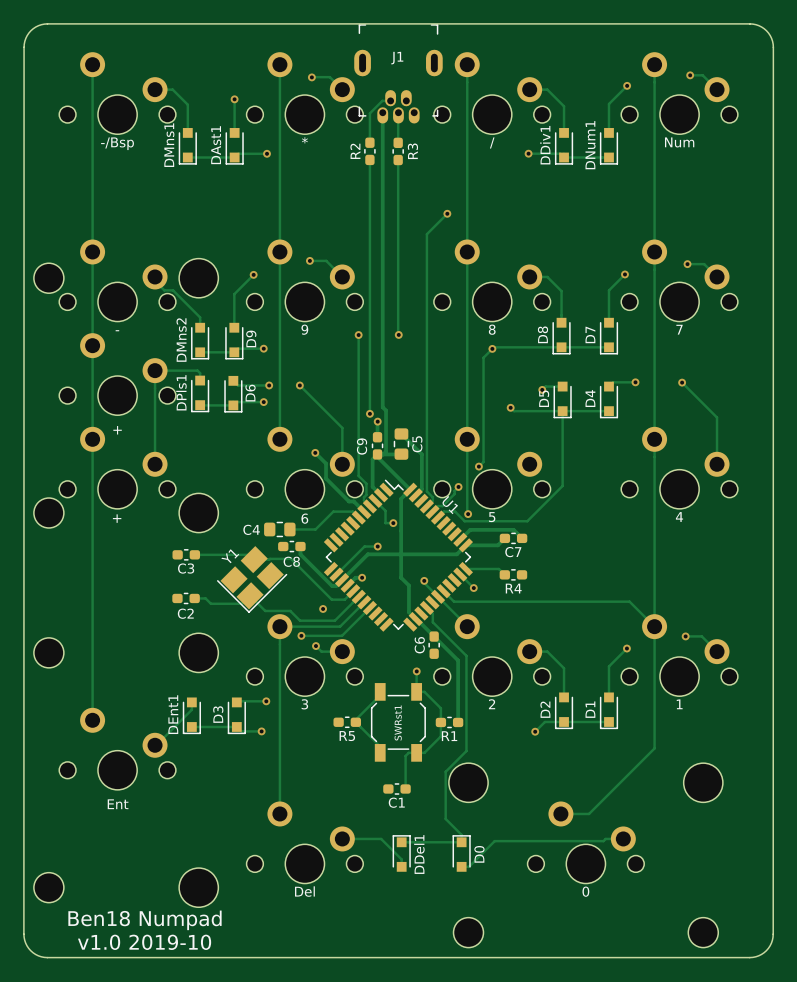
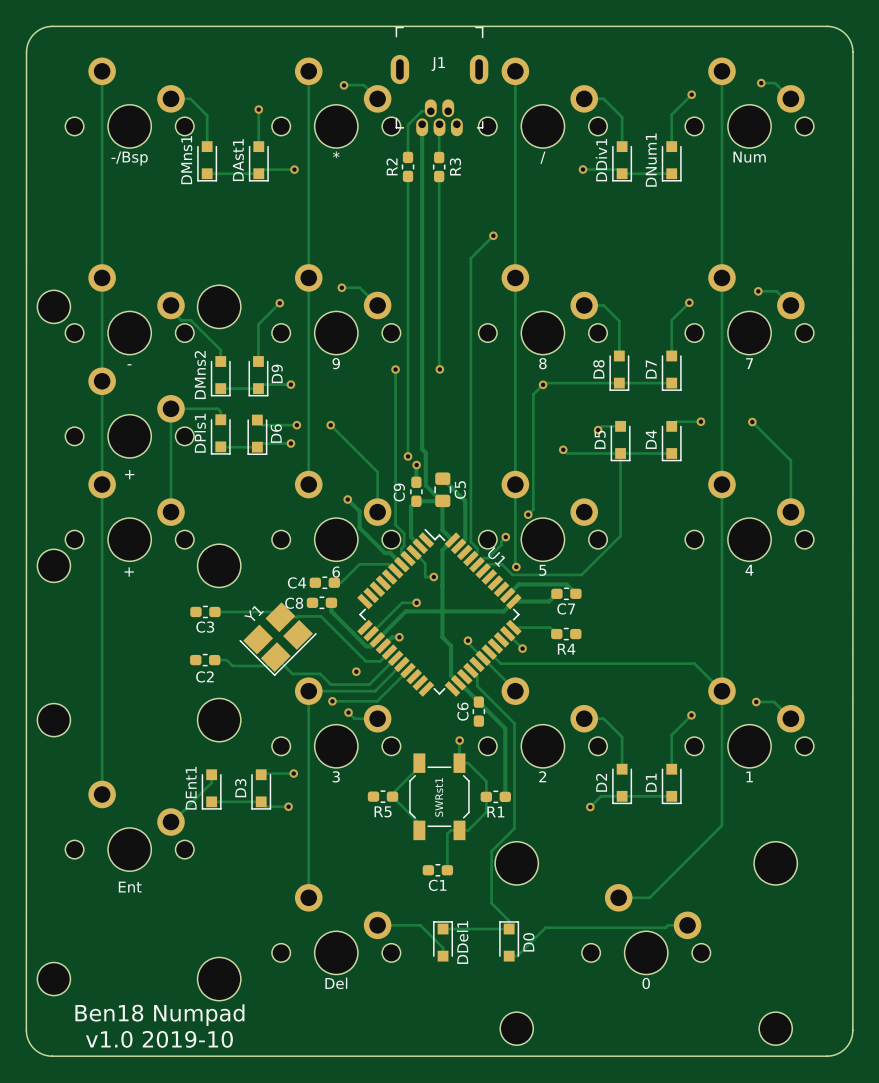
track: (386, 440) (386, 451) (383, 454) -> none
track: (377, 454) (377, 457) (401, 480) -> (425, 485) (442, 502) (442, 530)
track: (333, 511) (315, 529) (289, 529) -> (367, 564) (359, 564) (341, 582) (334, 582)
C4 footprint: [264, 521, 296, 538] -> [309, 576, 341, 589]
C8 name position: C8 (291, 561) -> C8 (294, 603)

